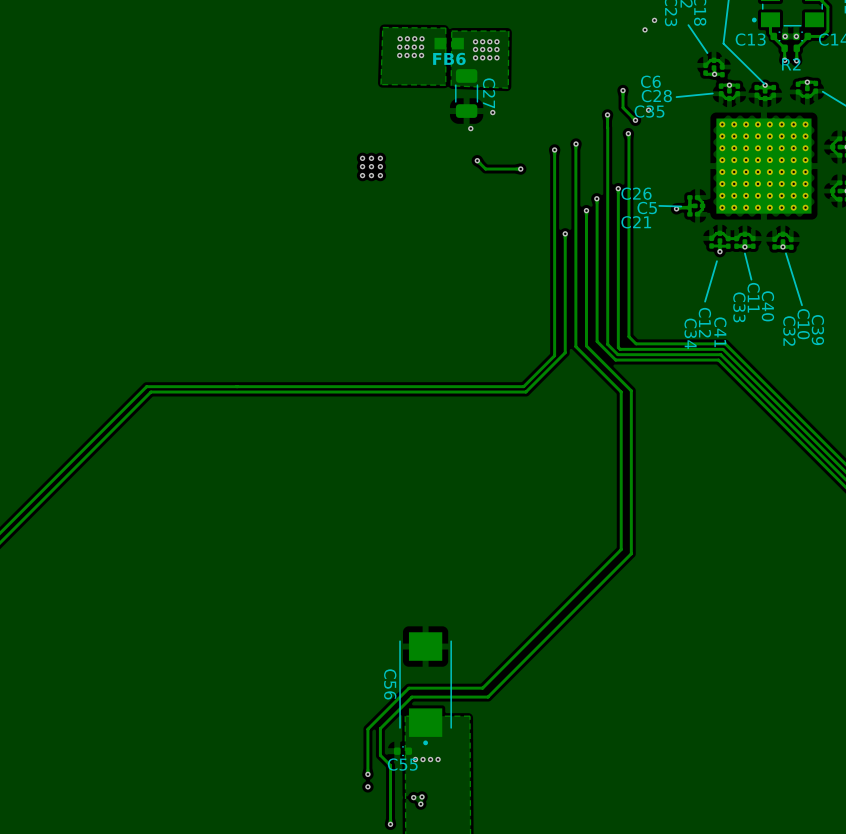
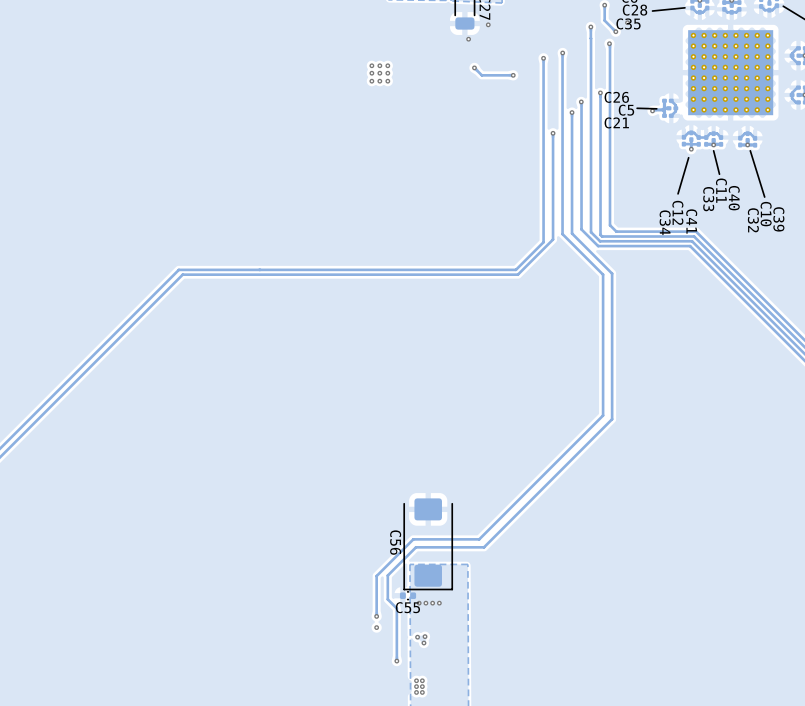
C56 footprint: [399, 632, 452, 746] -> [403, 498, 453, 591]

